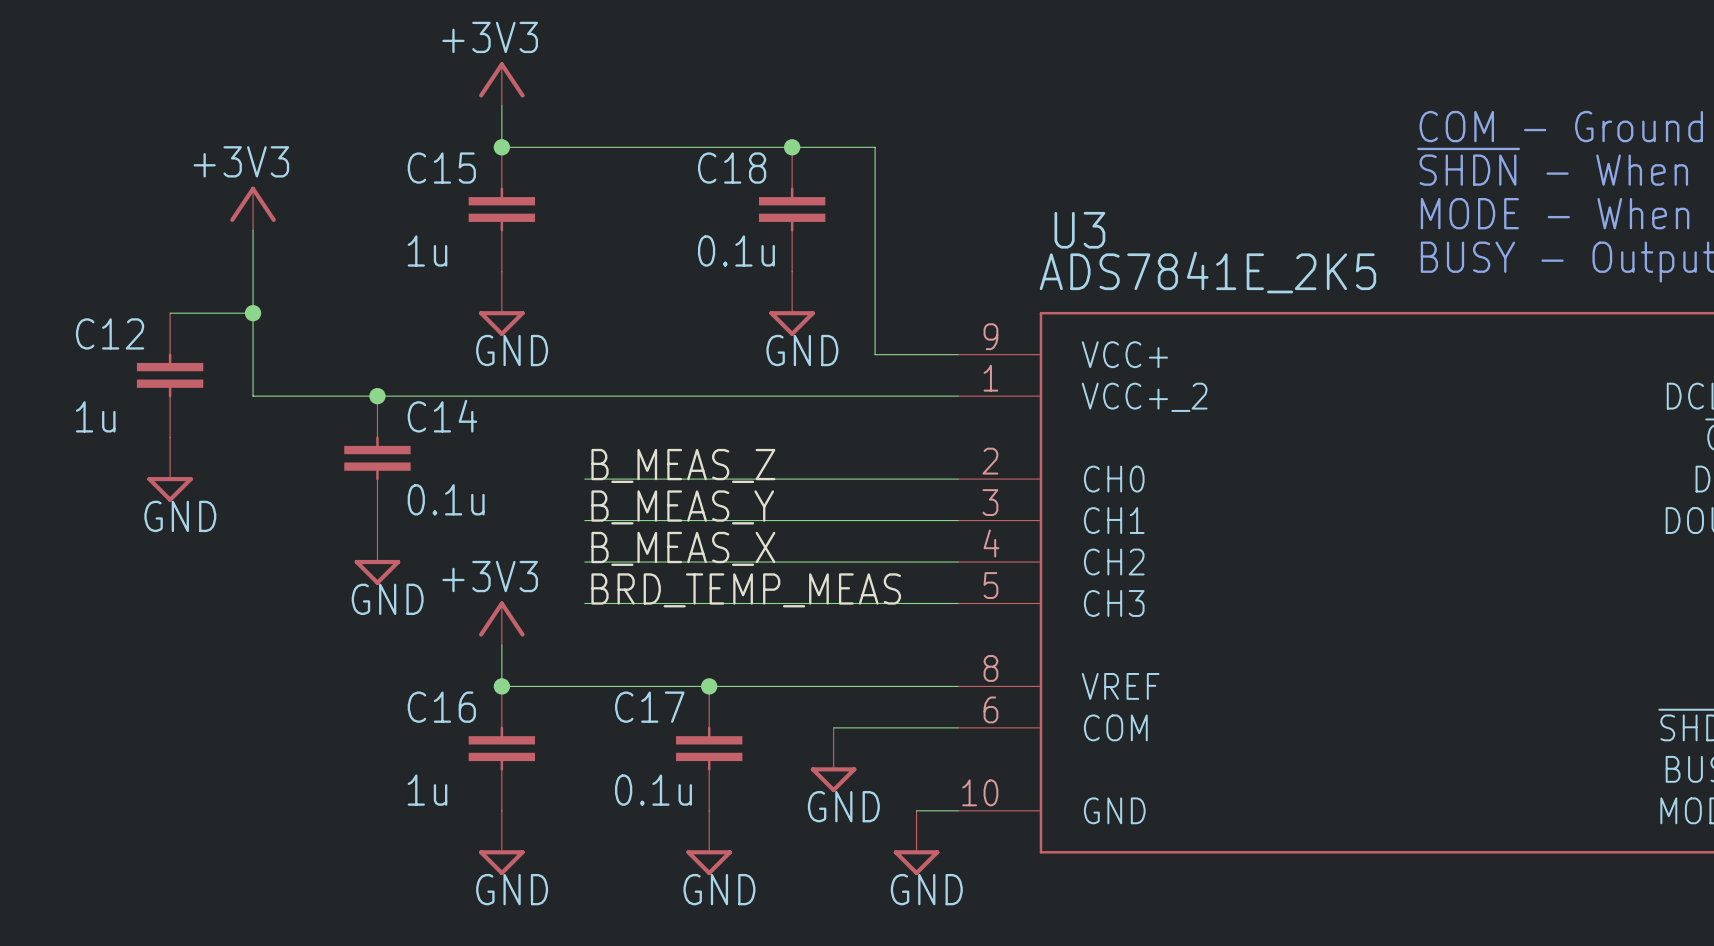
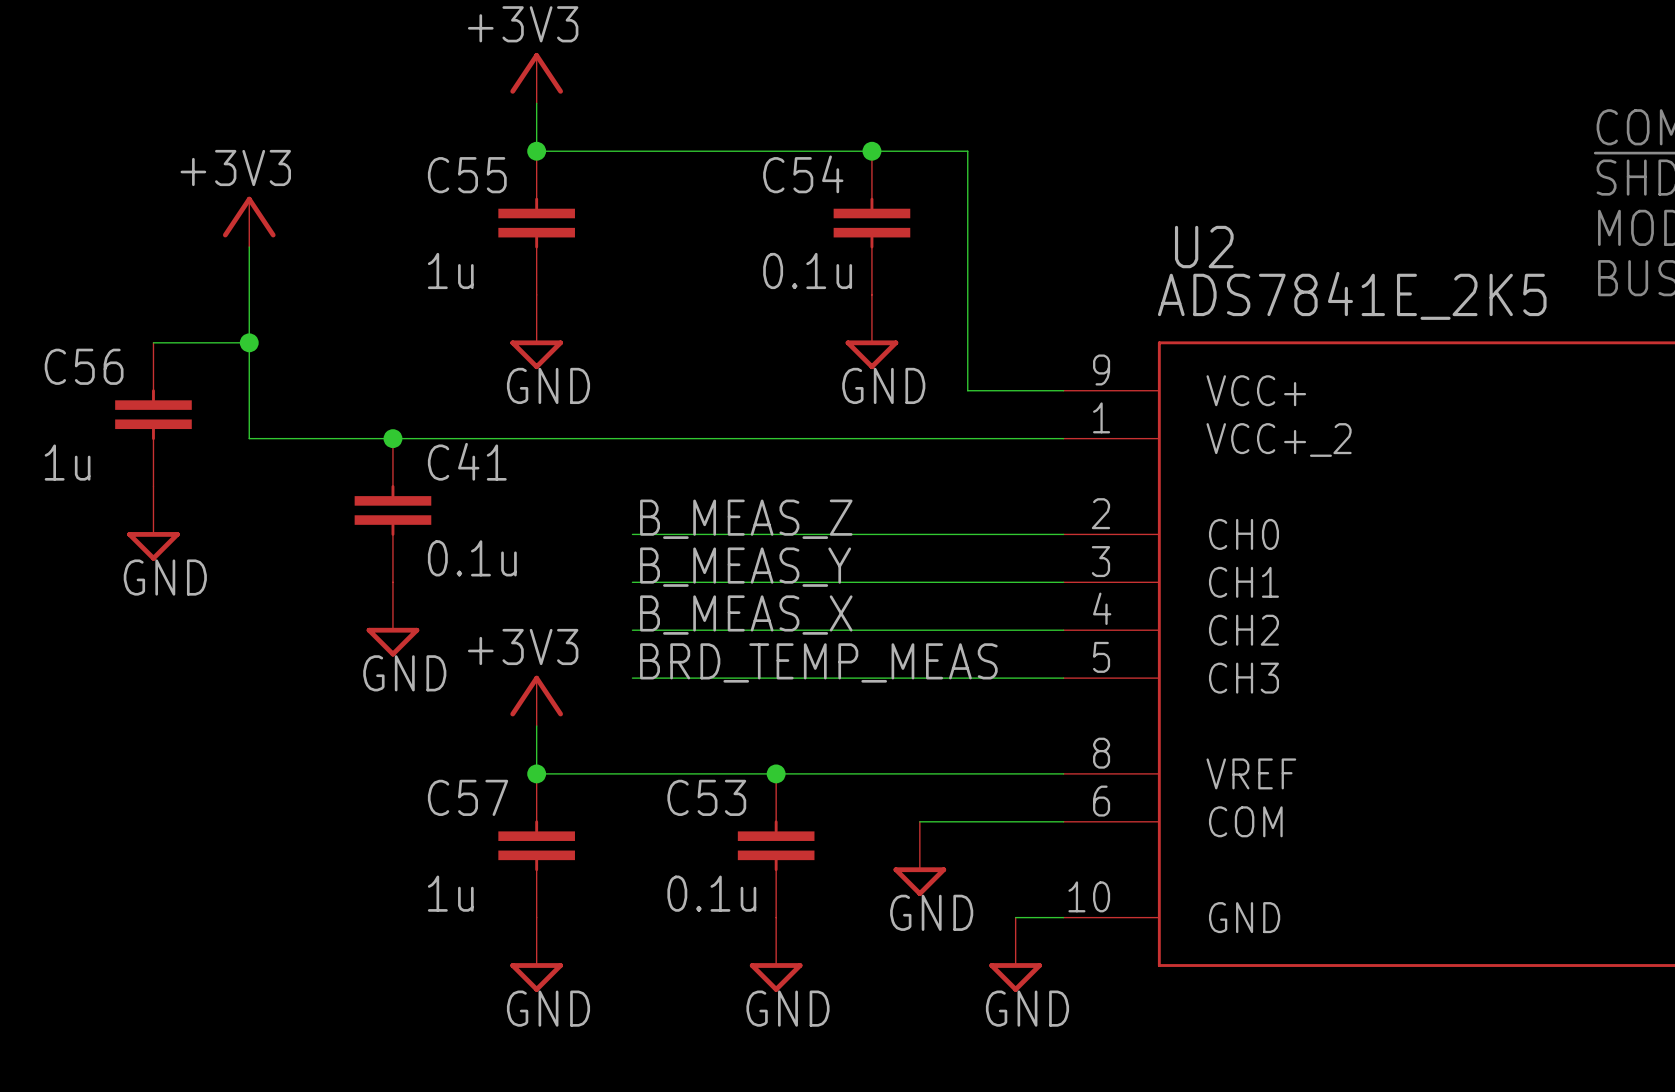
C15 name: C15 (441, 168) -> C55 (467, 175)
C18 name: C18 (732, 168) -> C54 (803, 174)
U3 name: U3 (1079, 230) -> U2 (1204, 247)
C12 name: C12 (110, 333) -> C56 (84, 366)
C14 name: C14 (442, 416) -> C41 (467, 461)
C16 name: C16 (441, 707) -> C57 (468, 797)
C17 name: C17 (649, 707) -> C53 (706, 797)

